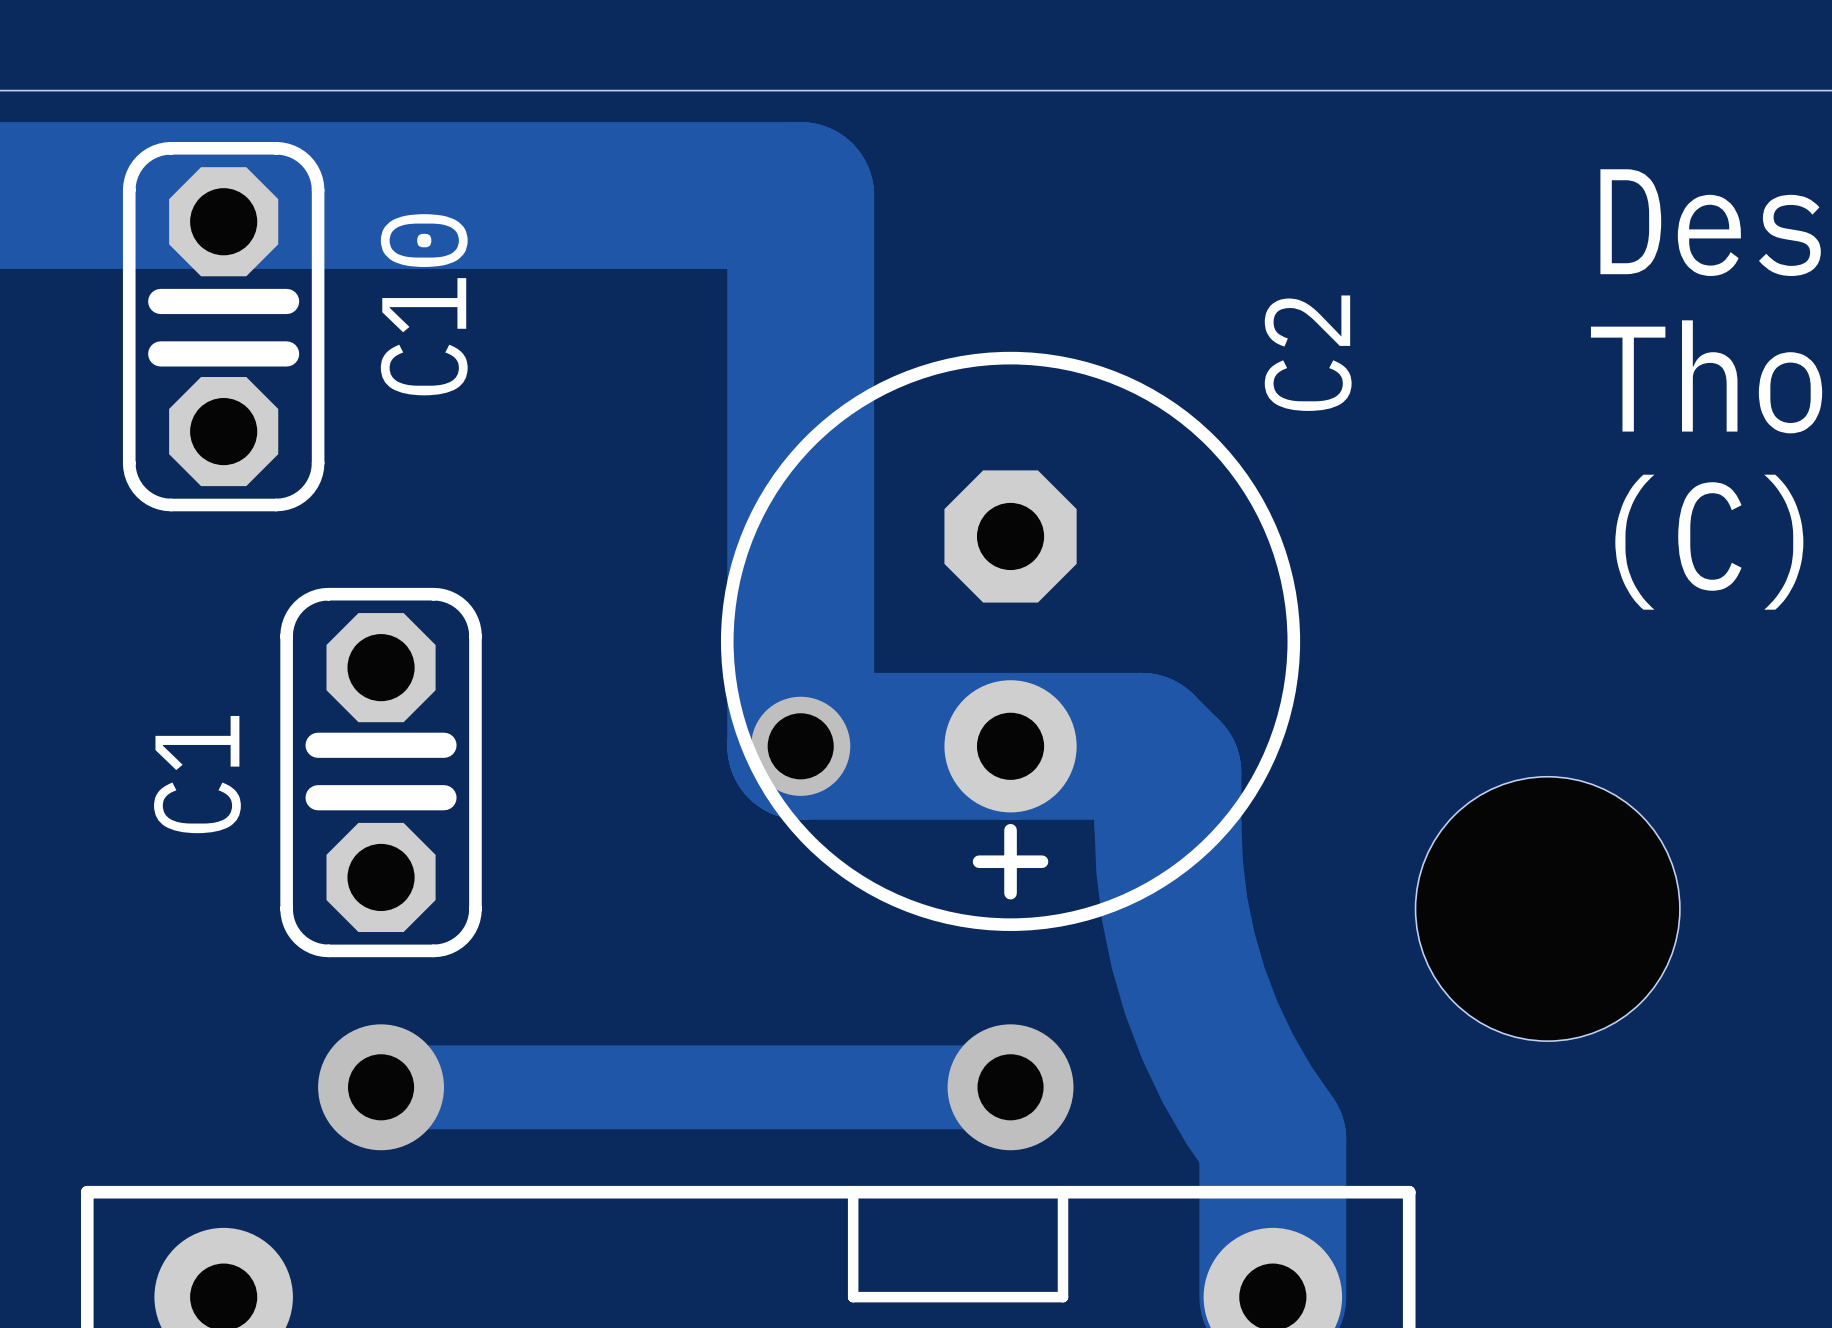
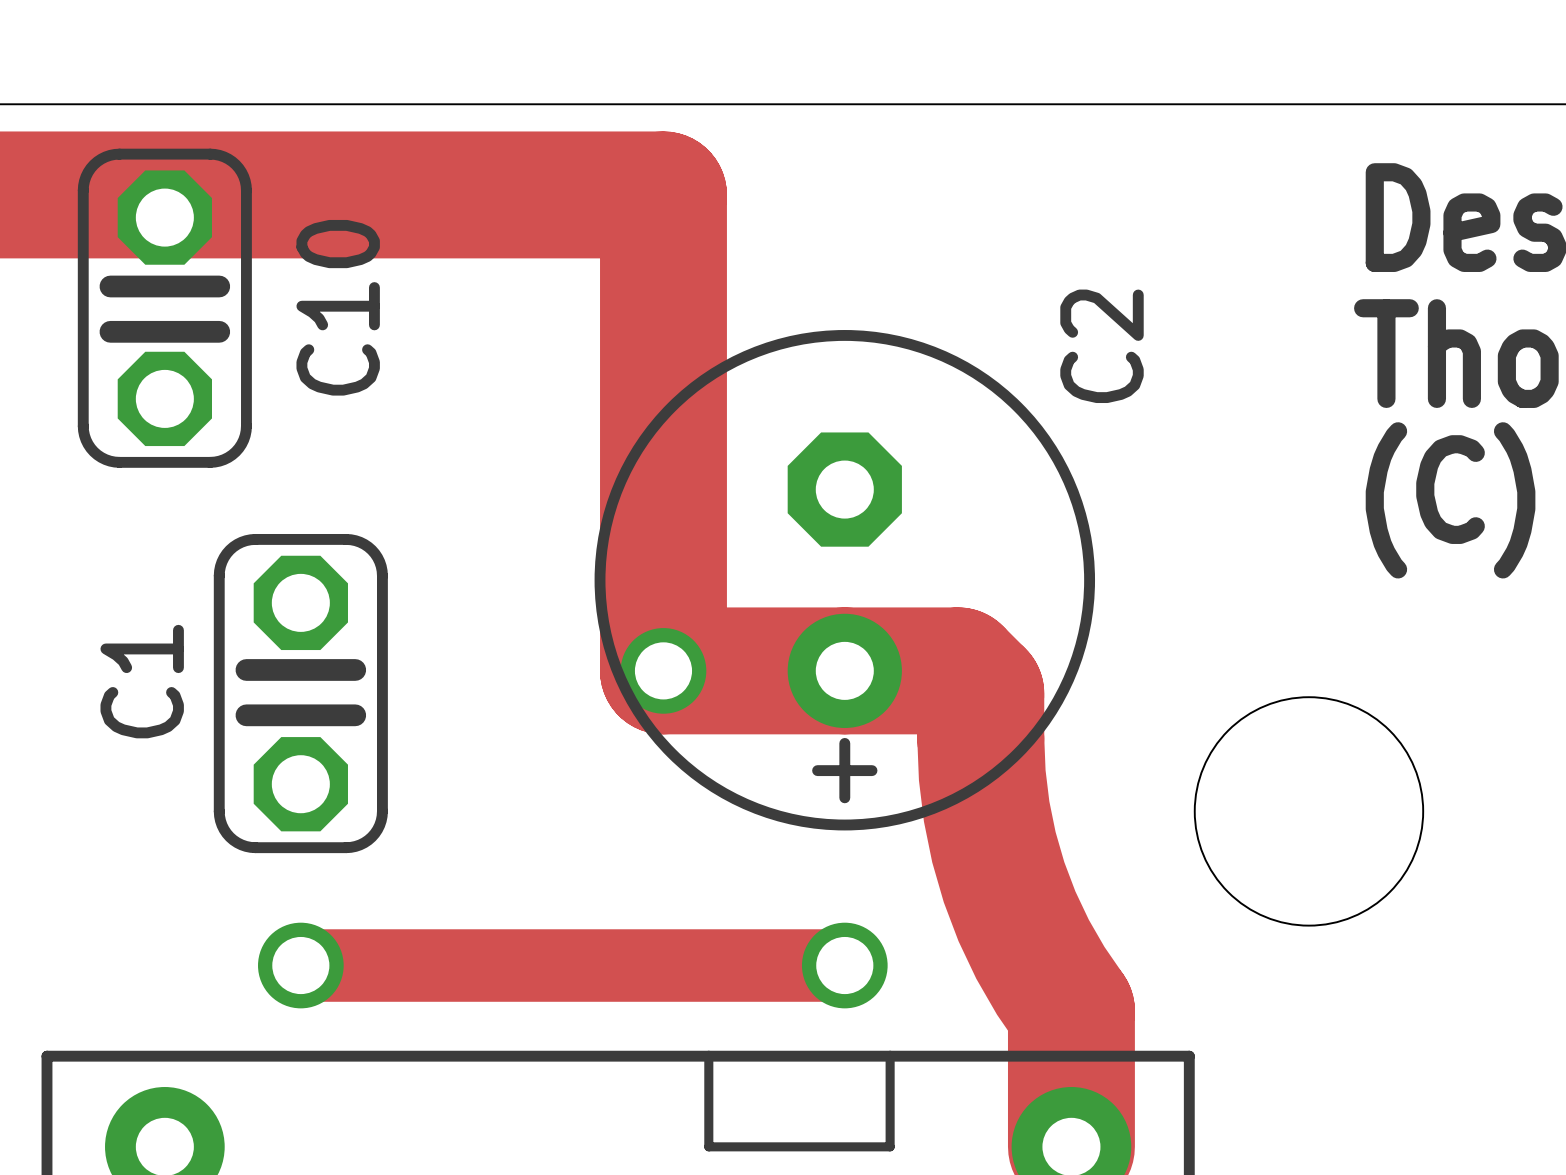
via size: [318, 1024, 444, 1151] -> [258, 922, 344, 1009]
via size: [947, 1024, 1074, 1151] -> [801, 922, 888, 1009]

